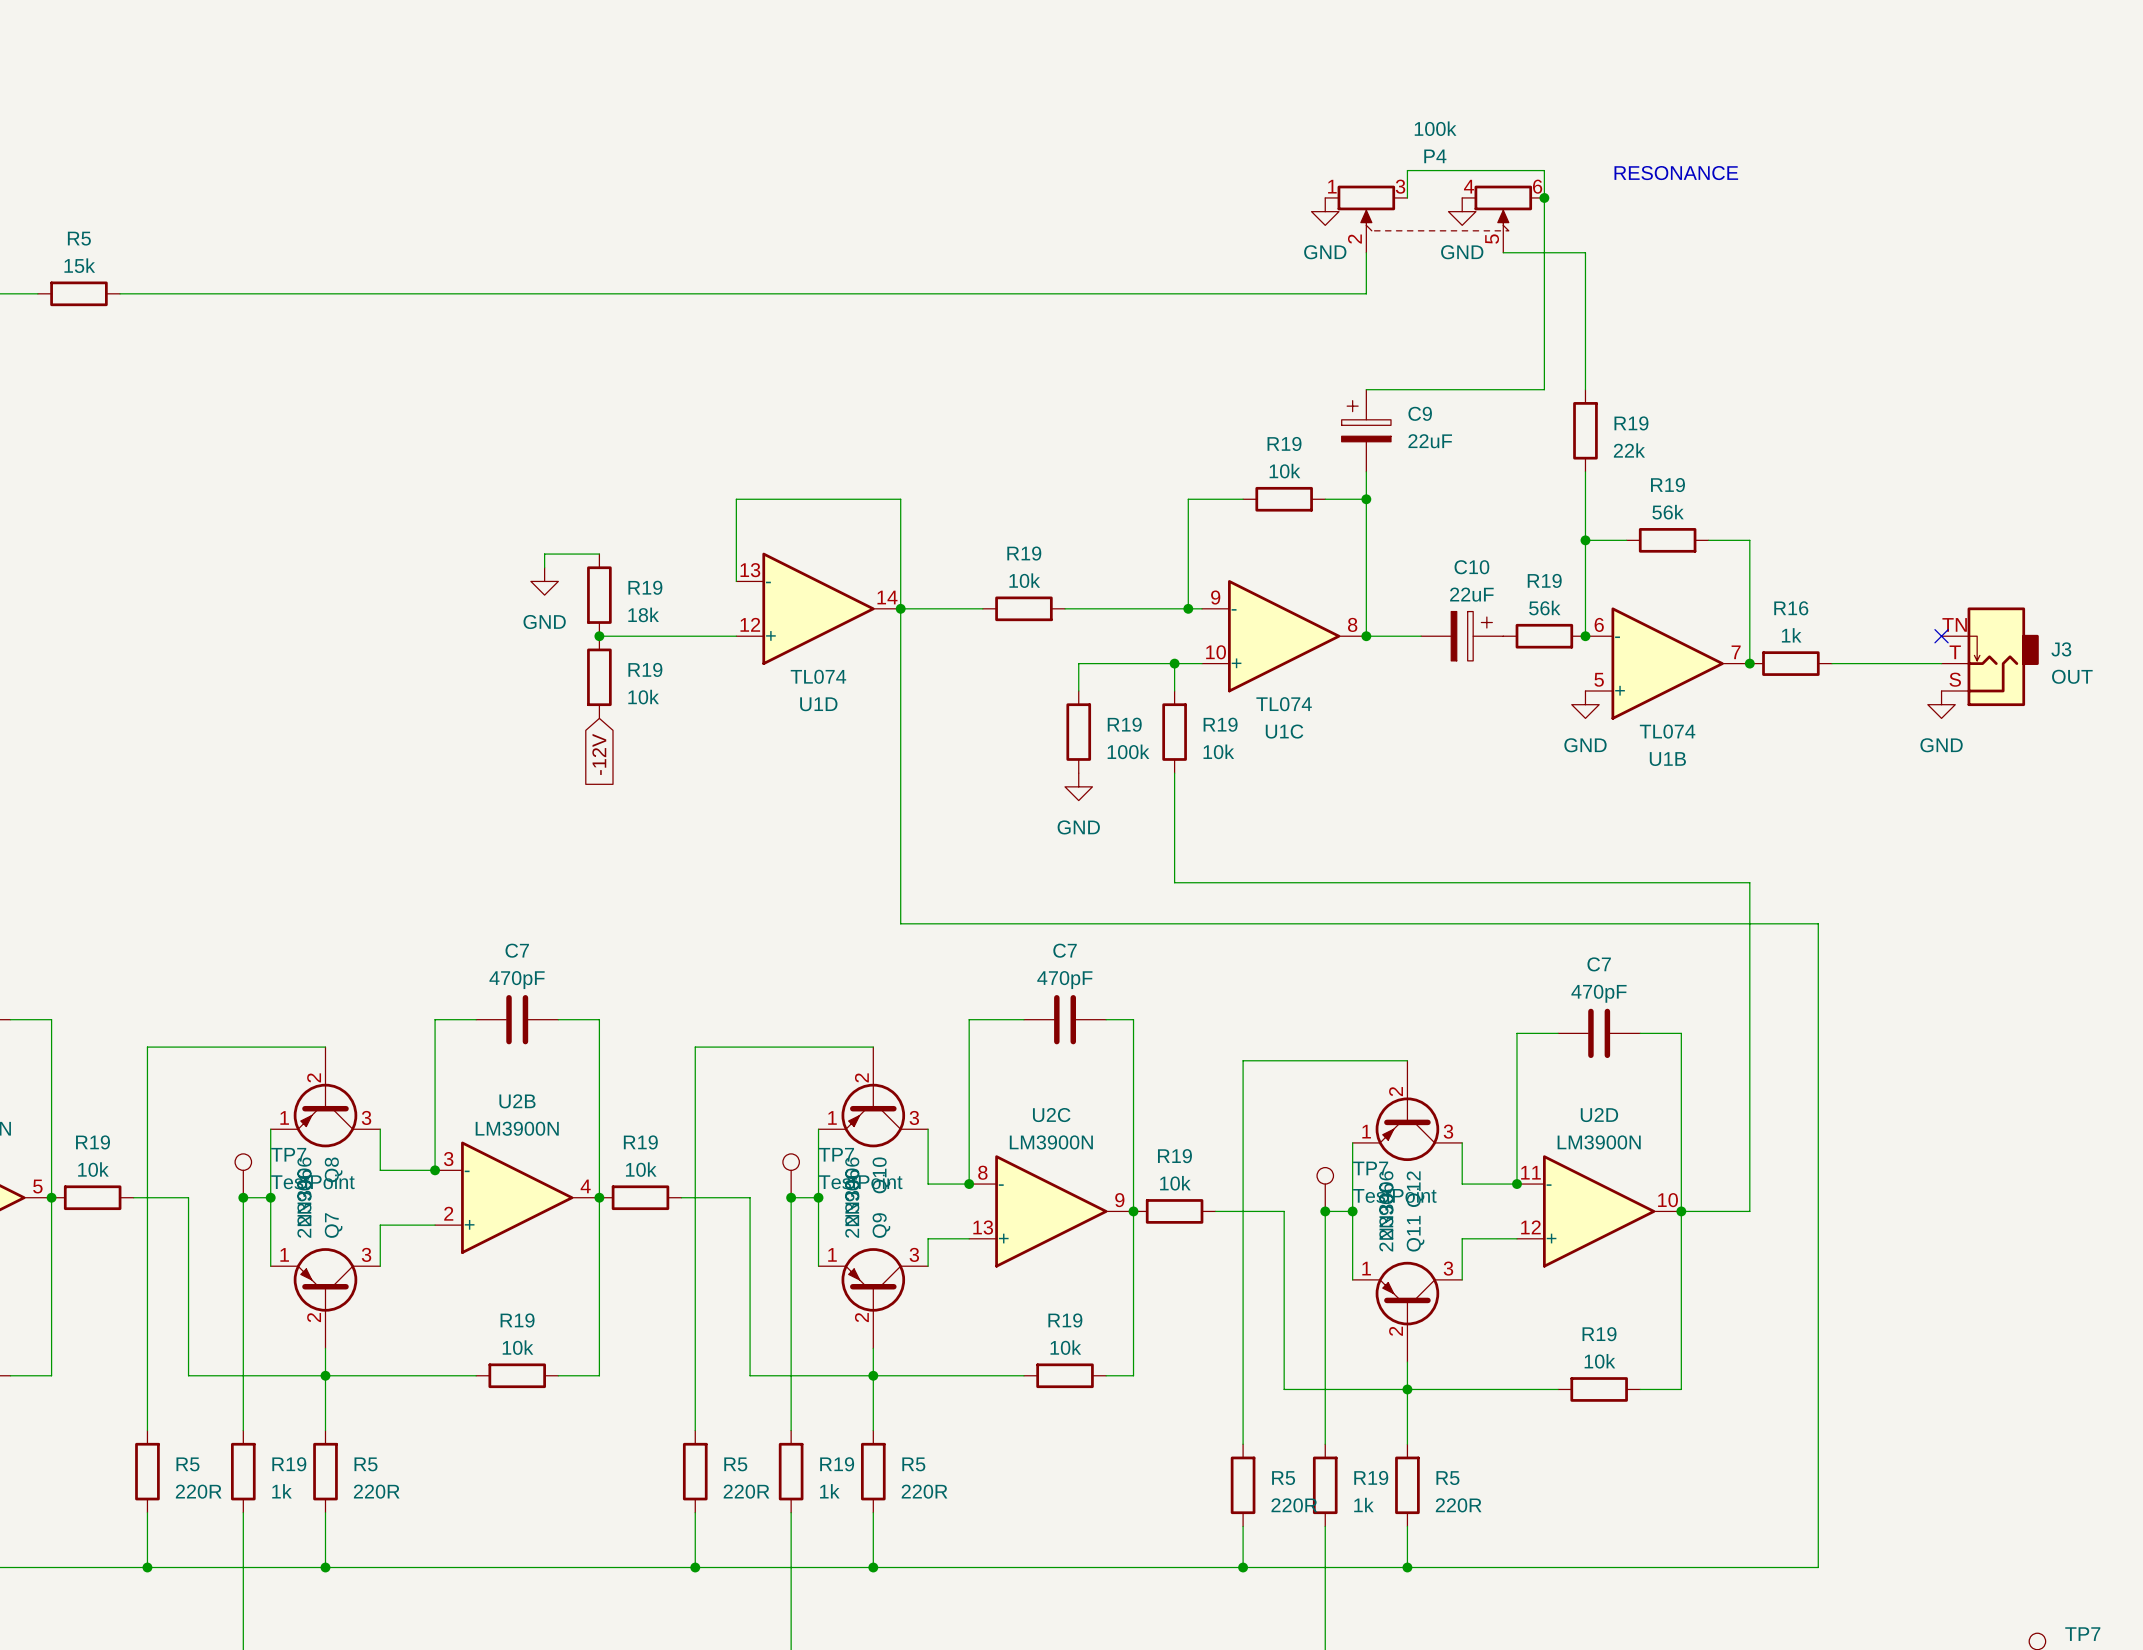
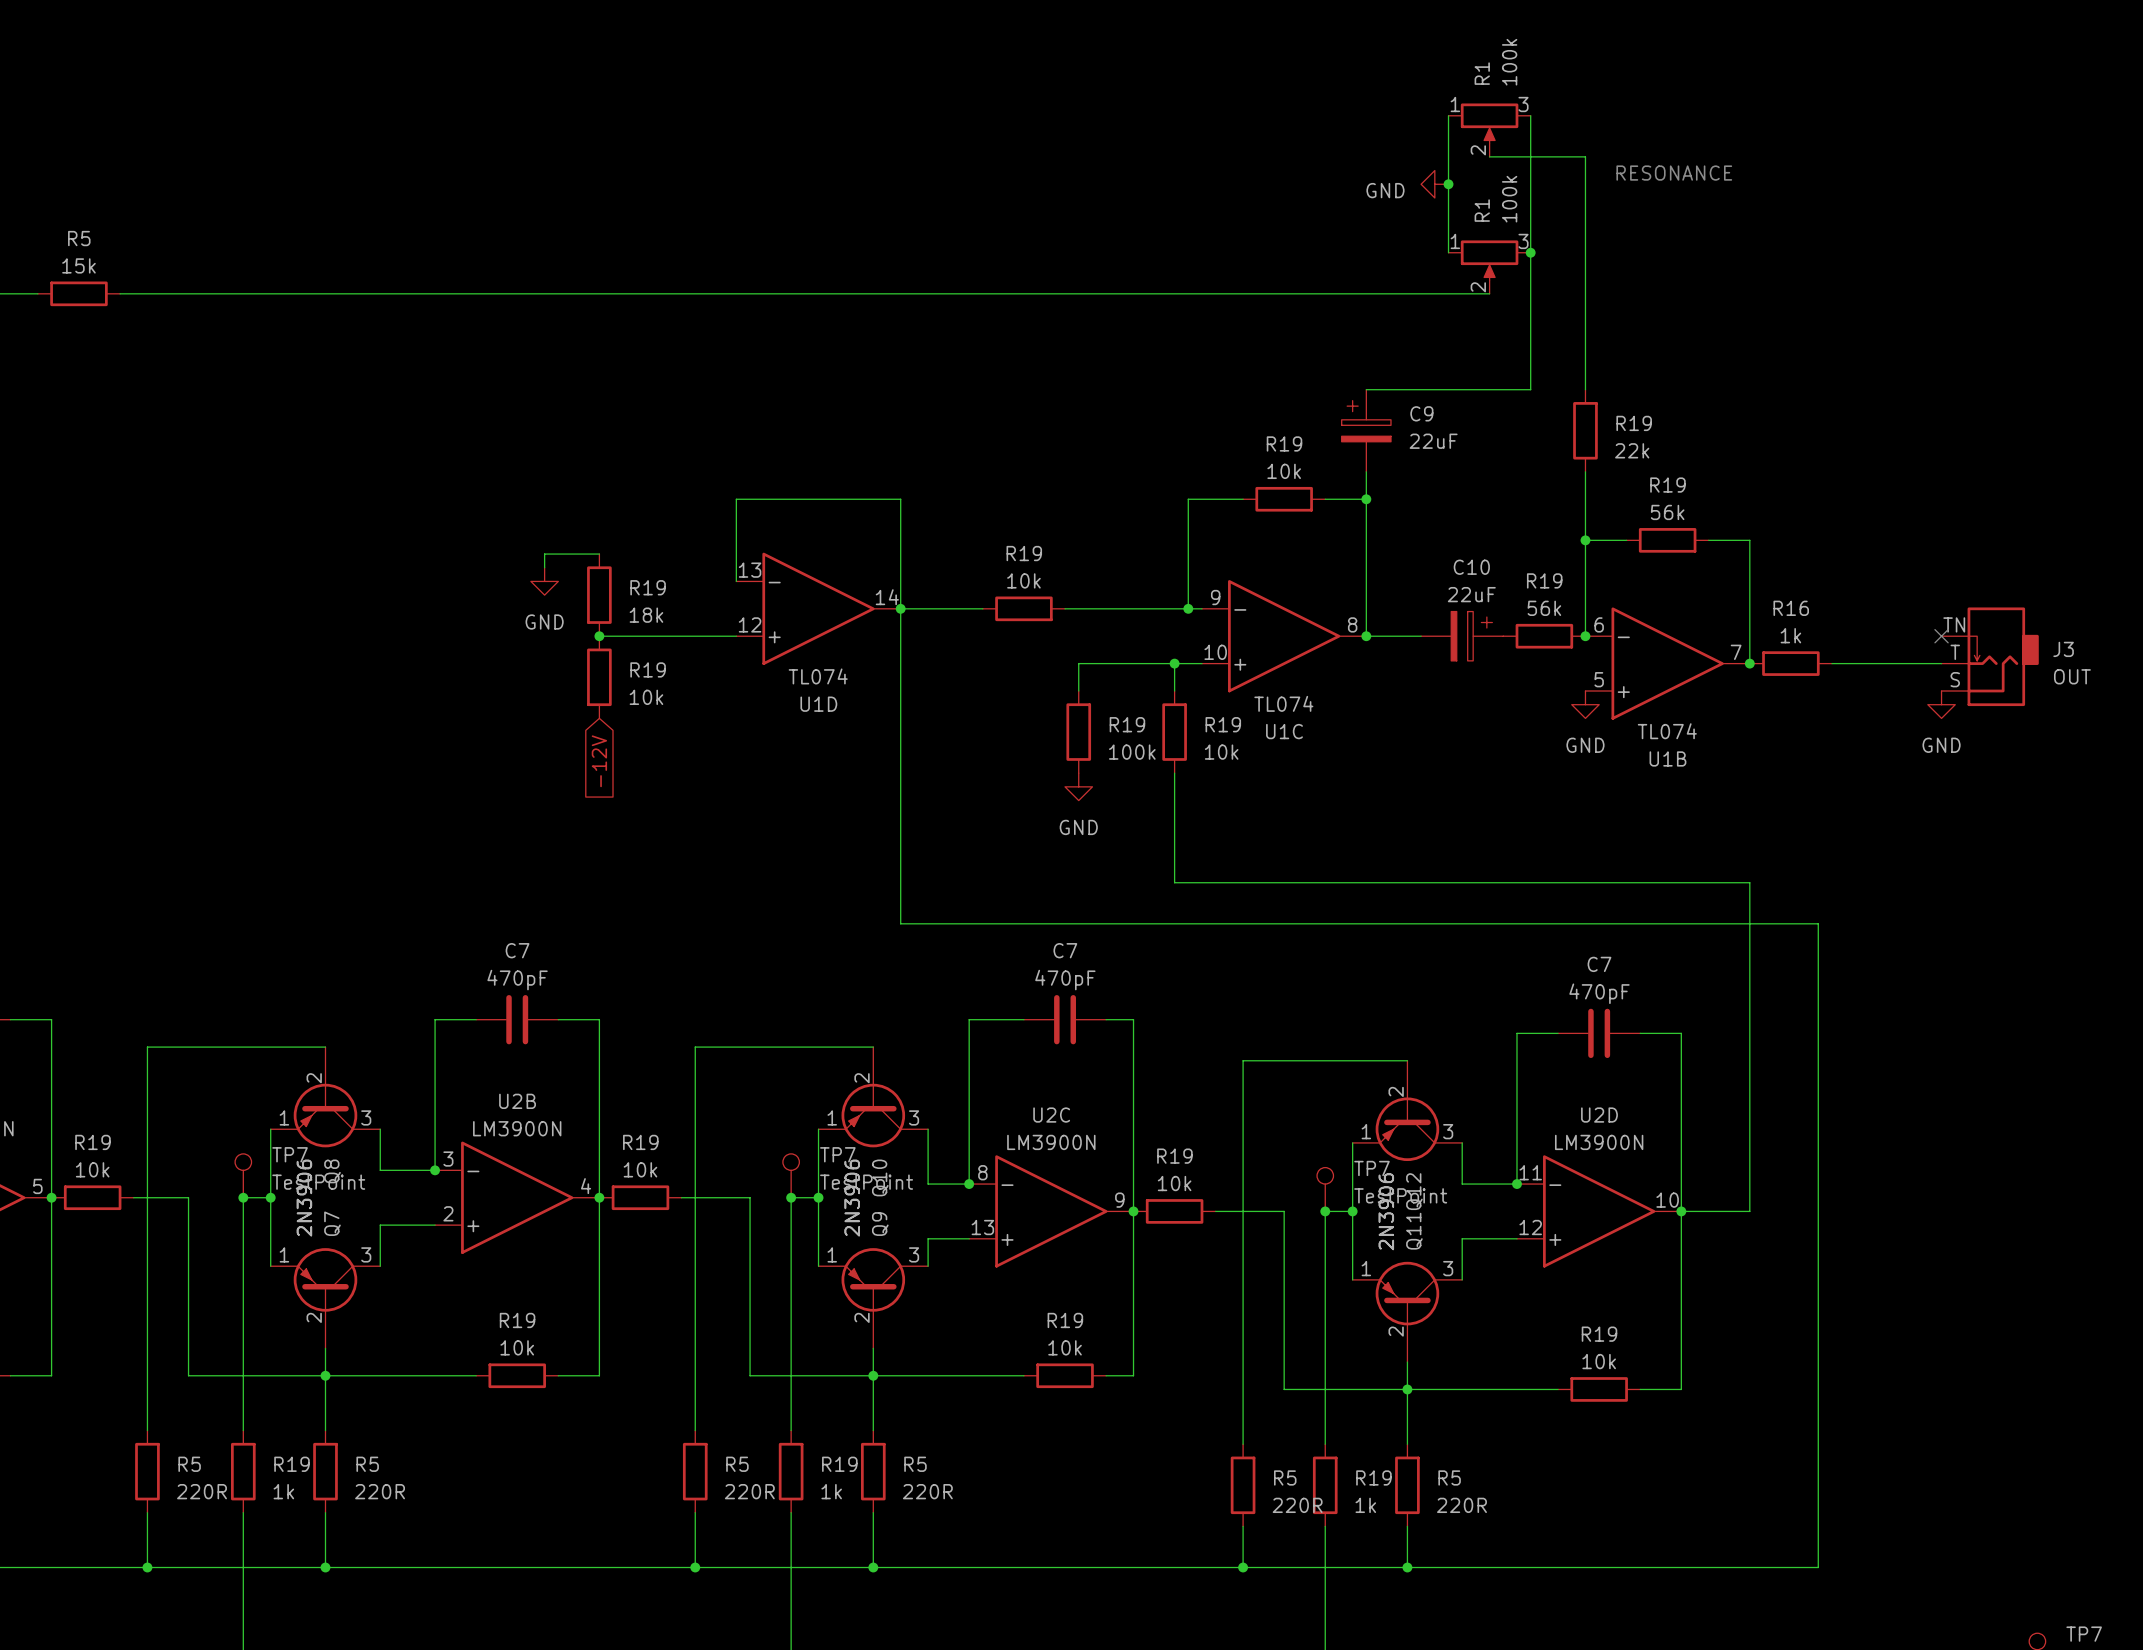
wire: none -> (1448, 115) (1448, 252)
R1: none -> 100k (1489, 130)
junction: none -> (1448, 184)
wire: (1407, 197) (1407, 170) (1544, 170) (1544, 389) (1530, 389) -> (1530, 115) (1530, 389)
junction: (1544, 197) -> none
power symbol: GND (1325, 211) -> none
power symbol rotation: 0° (1462, 211) -> 90° clockwise (1434, 184)
power symbol position: GND (1462, 211) -> GND (1434, 184)
P4: 100k (1434, 219) -> none
wire: (1366, 252) (1366, 293) -> (1489, 293) (1366, 293)
wire: (1503, 252) (1585, 252) -> (1489, 156) (1585, 156) (1585, 252)
junction: none -> (1530, 252)
R1: none -> 100k (1489, 267)

